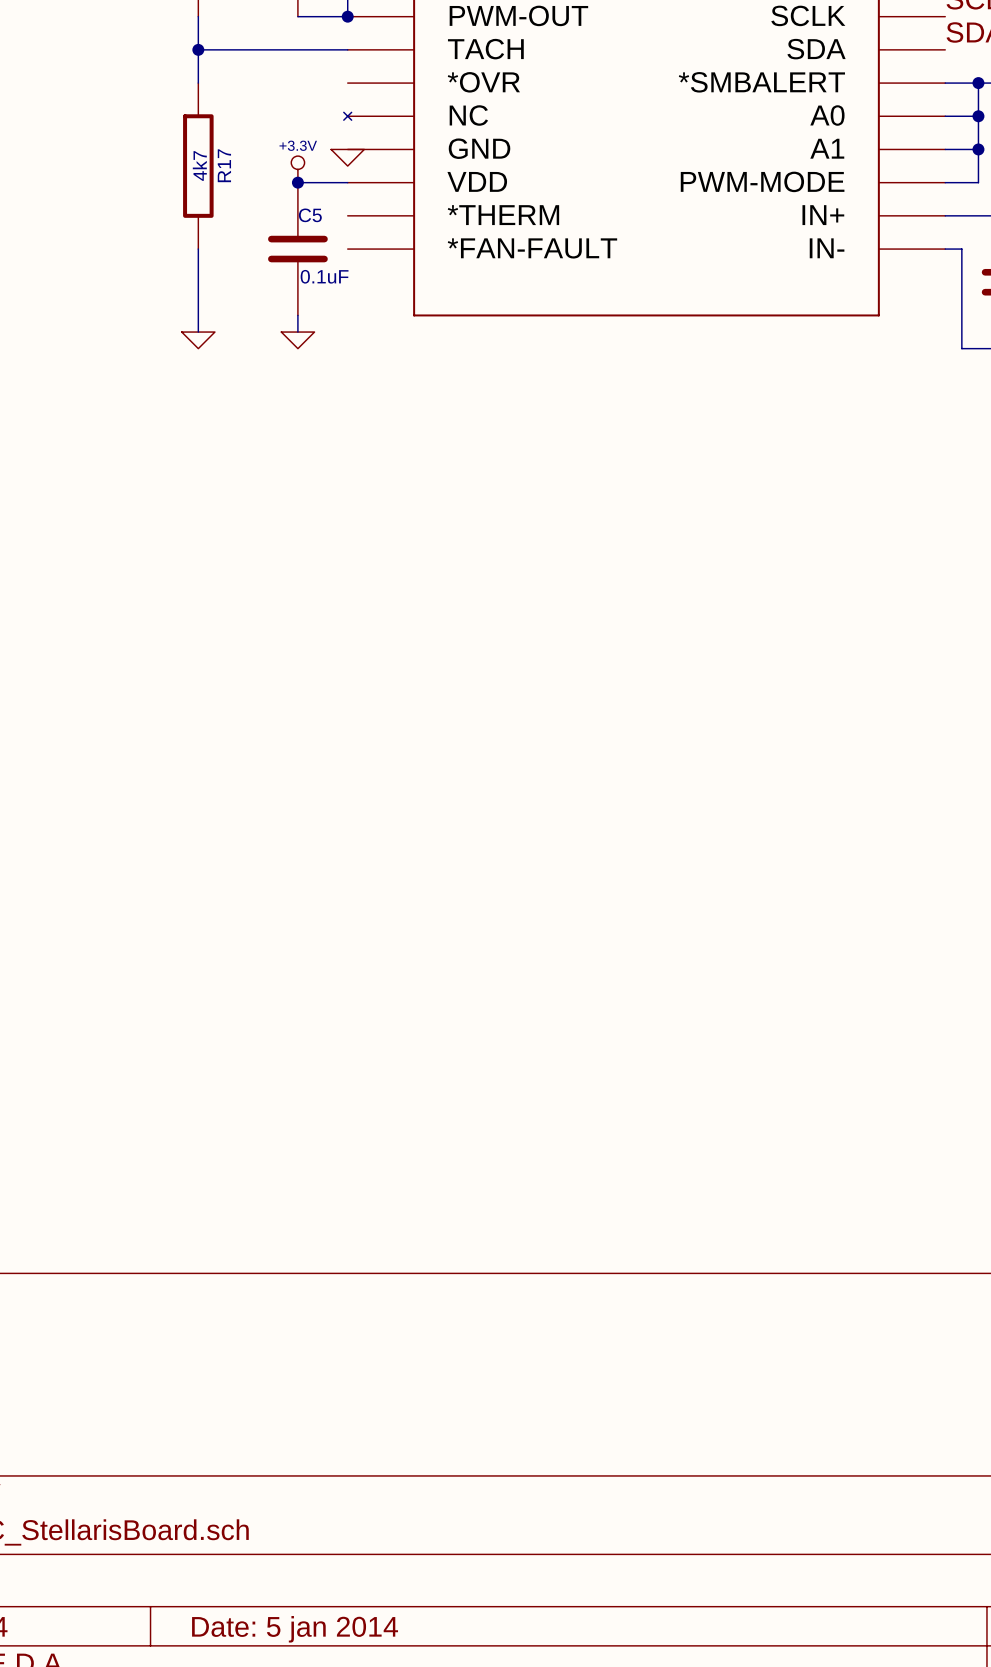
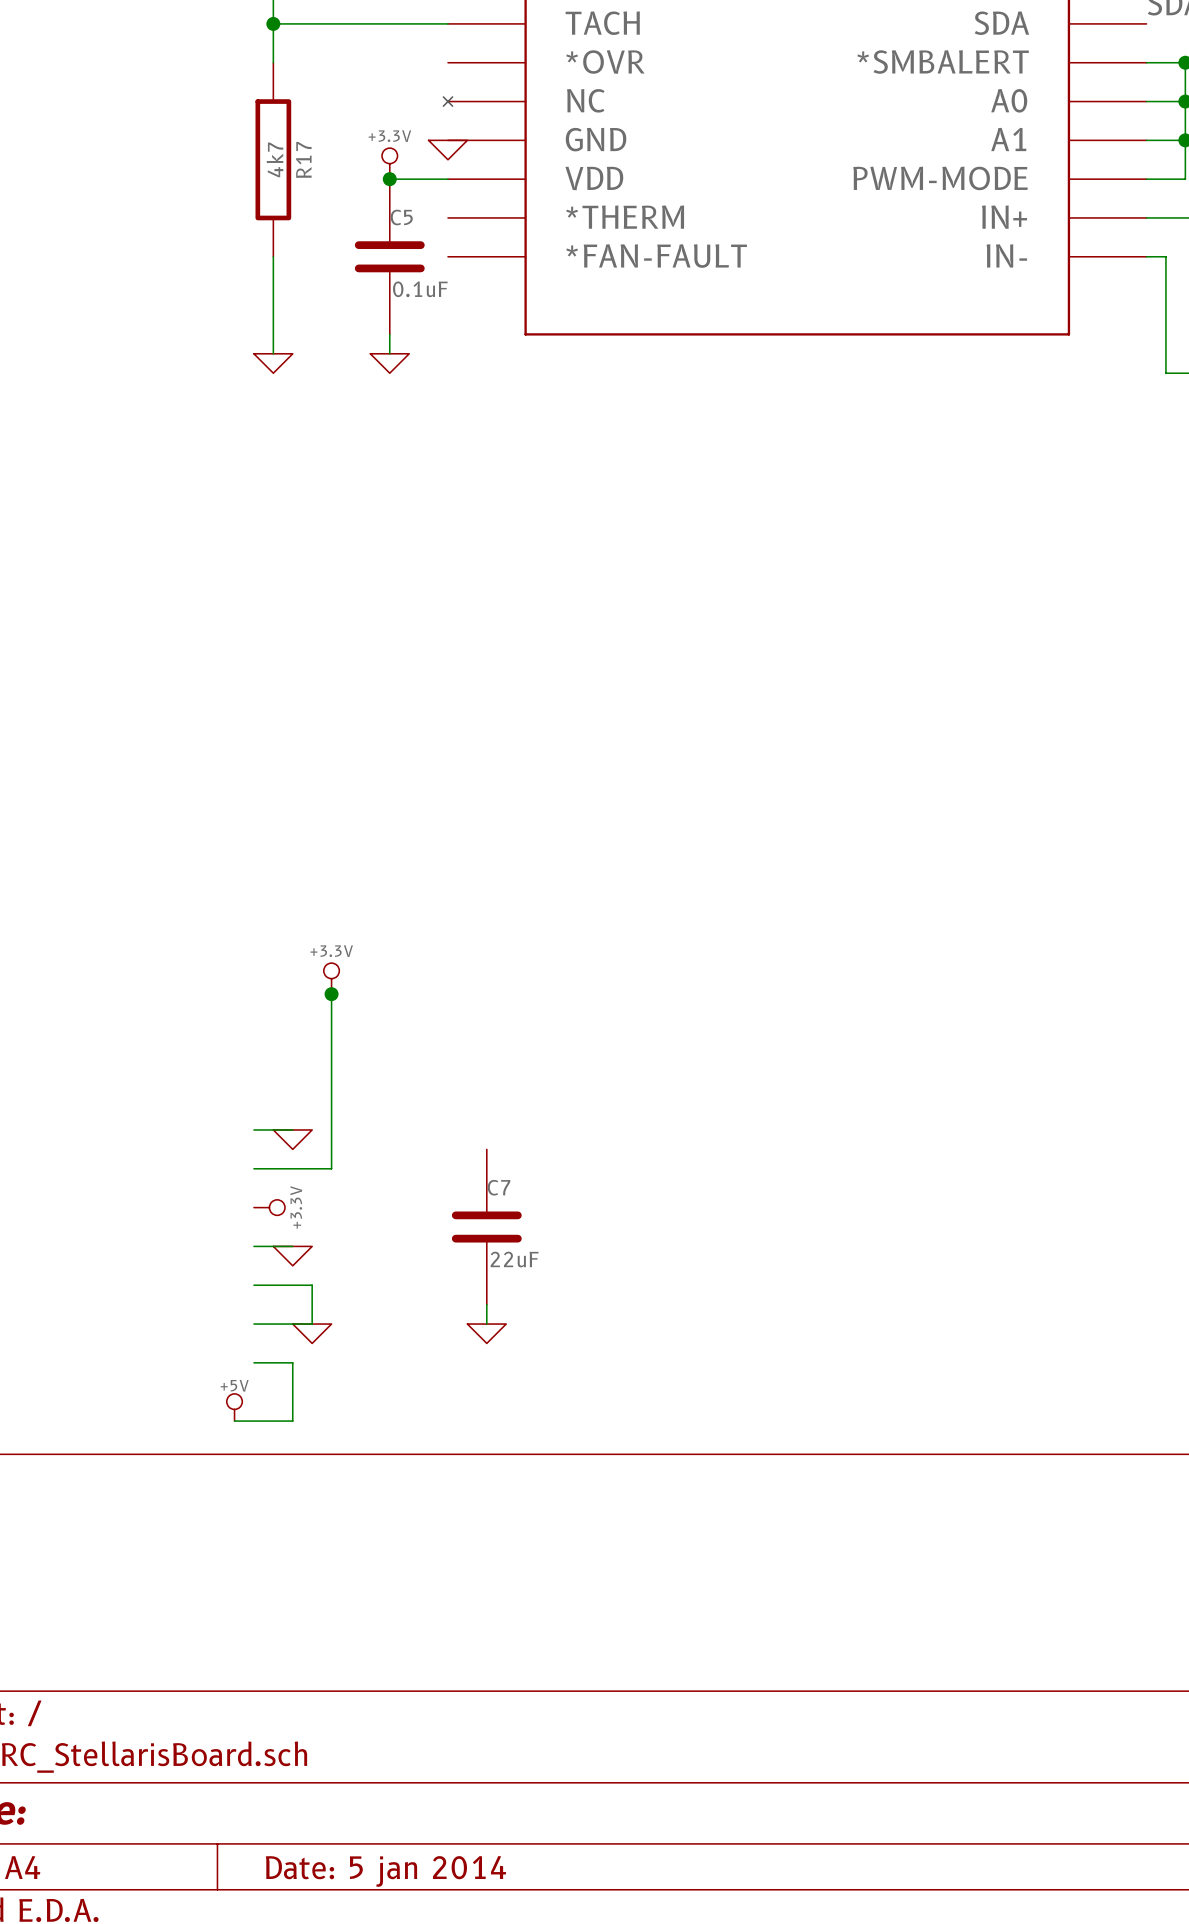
power symbol: none -> +3.3V (331, 978)
wire: none -> (331, 994) (331, 1168) (253, 1168)
junction: none -> (331, 994)
wire: none -> (253, 1129) (292, 1129)
power symbol: none -> (292, 1139)
power symbol: none -> +3.3V (269, 1207)
C7: none -> 22uF (486, 1227)
wire: none -> (253, 1246) (292, 1246)
power symbol: none -> (292, 1256)
wire: none -> (253, 1285) (312, 1285) (312, 1324) (253, 1324)
wire: none -> (486, 1304) (486, 1324)
power symbol: none -> (312, 1333)
power symbol: none -> (486, 1333)
wire: none -> (253, 1362) (292, 1362) (292, 1421) (234, 1421)
power symbol: none -> +5V (234, 1407)

